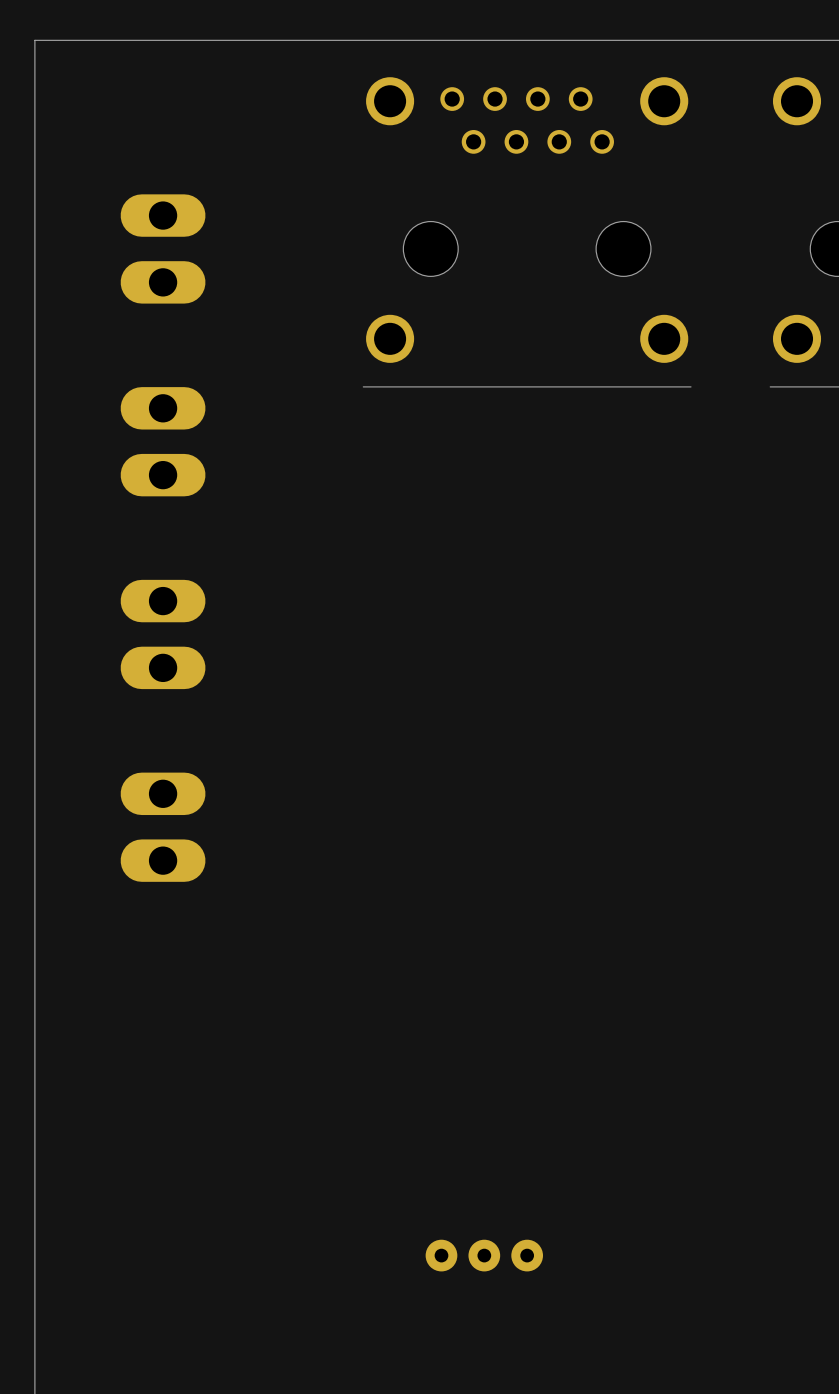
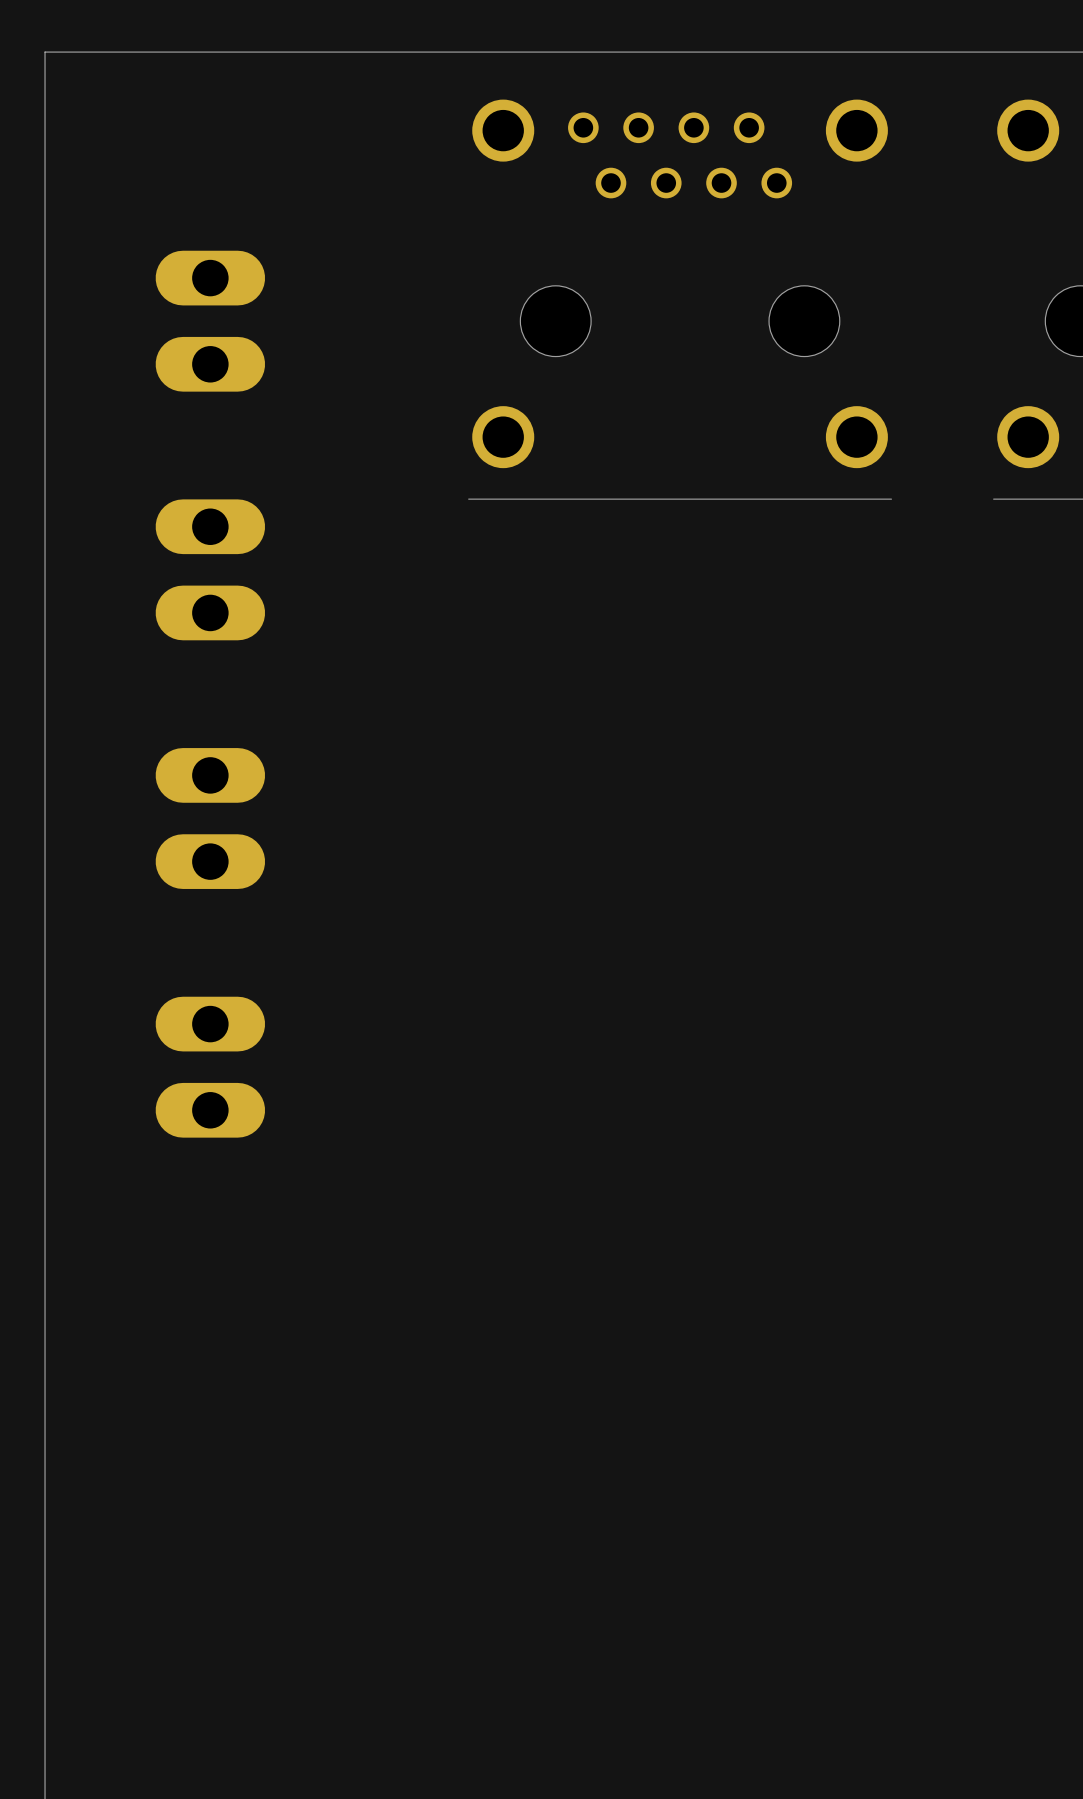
part: (484, 1255) -> none

